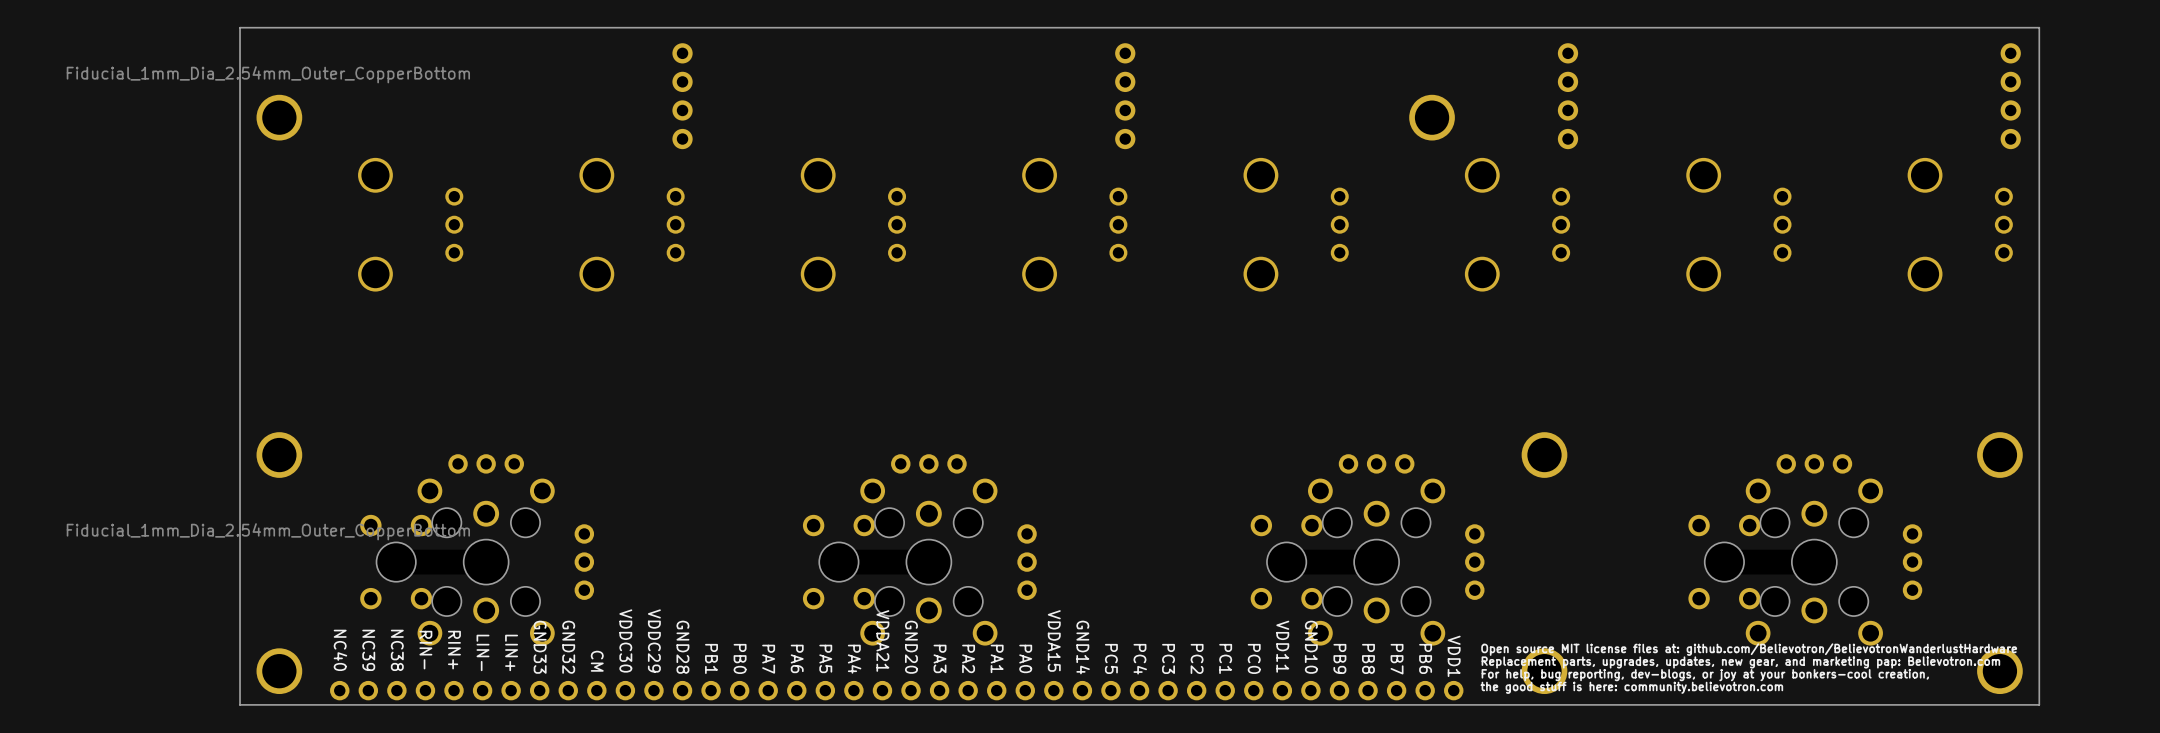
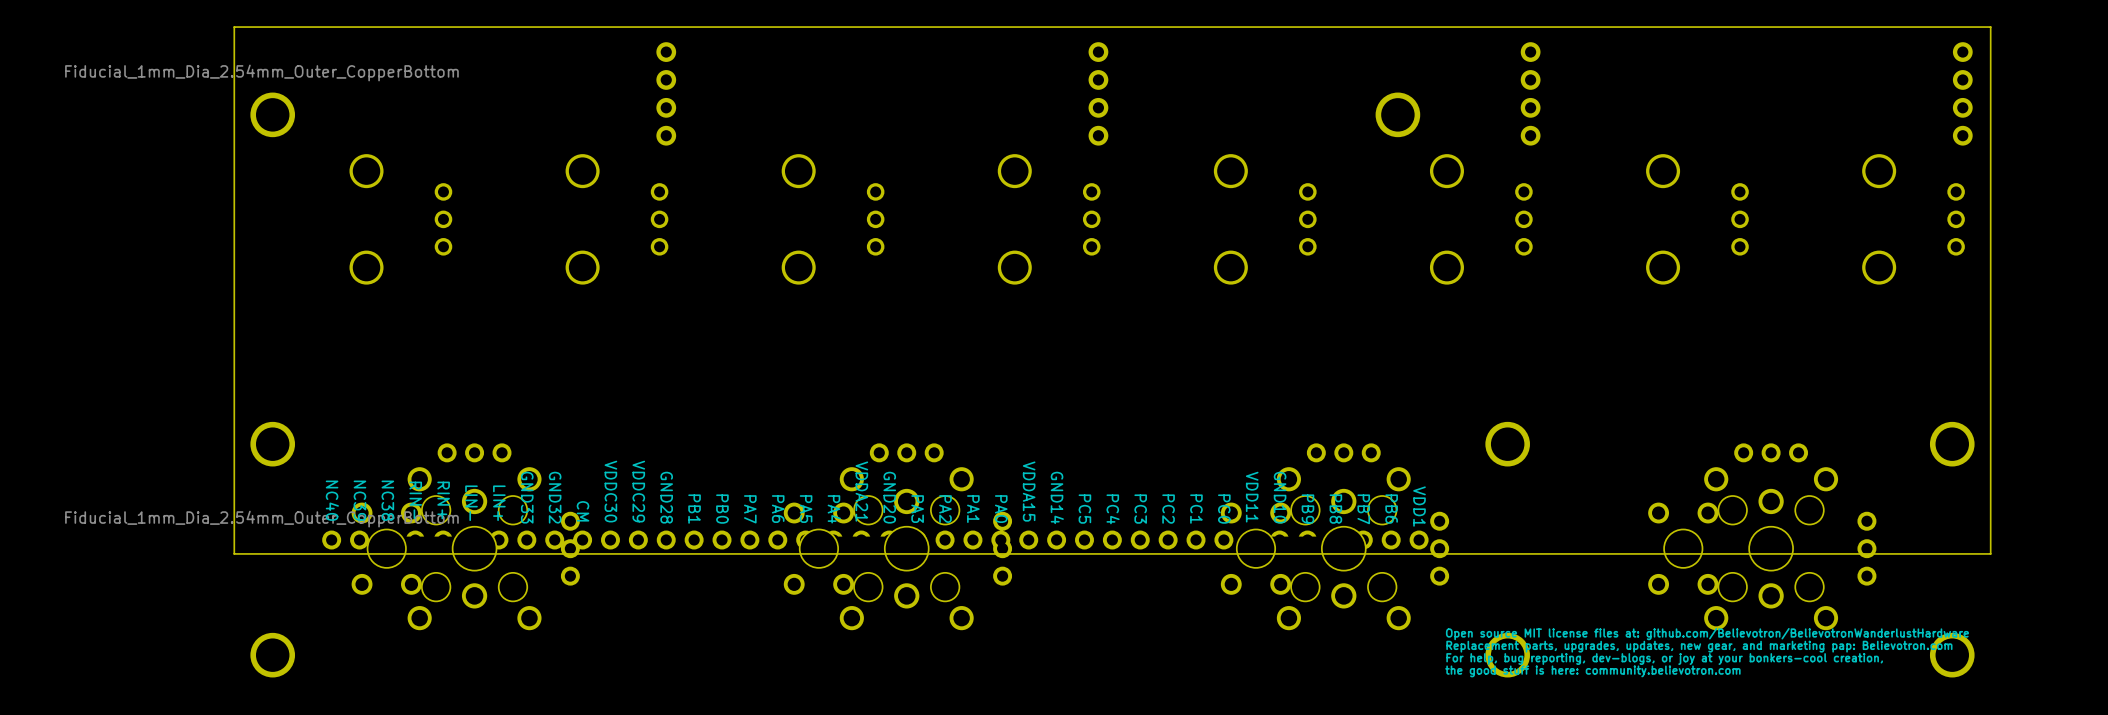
board edge: (2039, 567) (2039, 704) (240, 704) (240, 567) -> (1990, 553) (234, 553)
part position: (896, 690) -> (875, 540)

